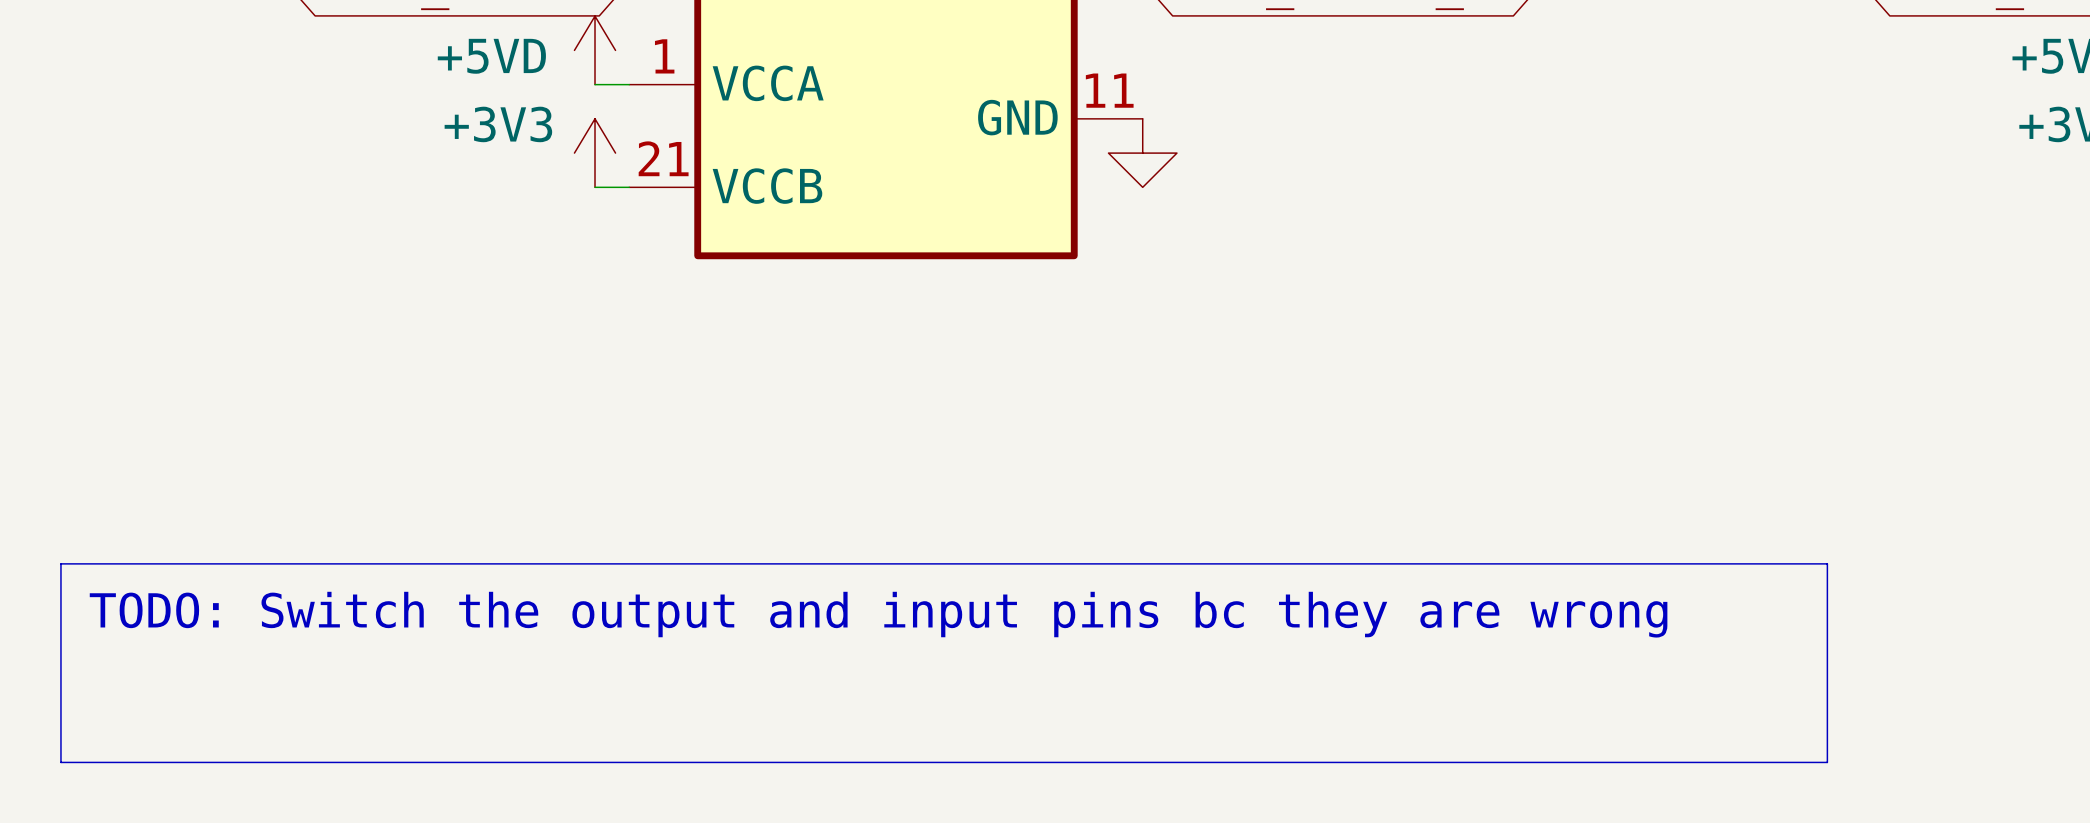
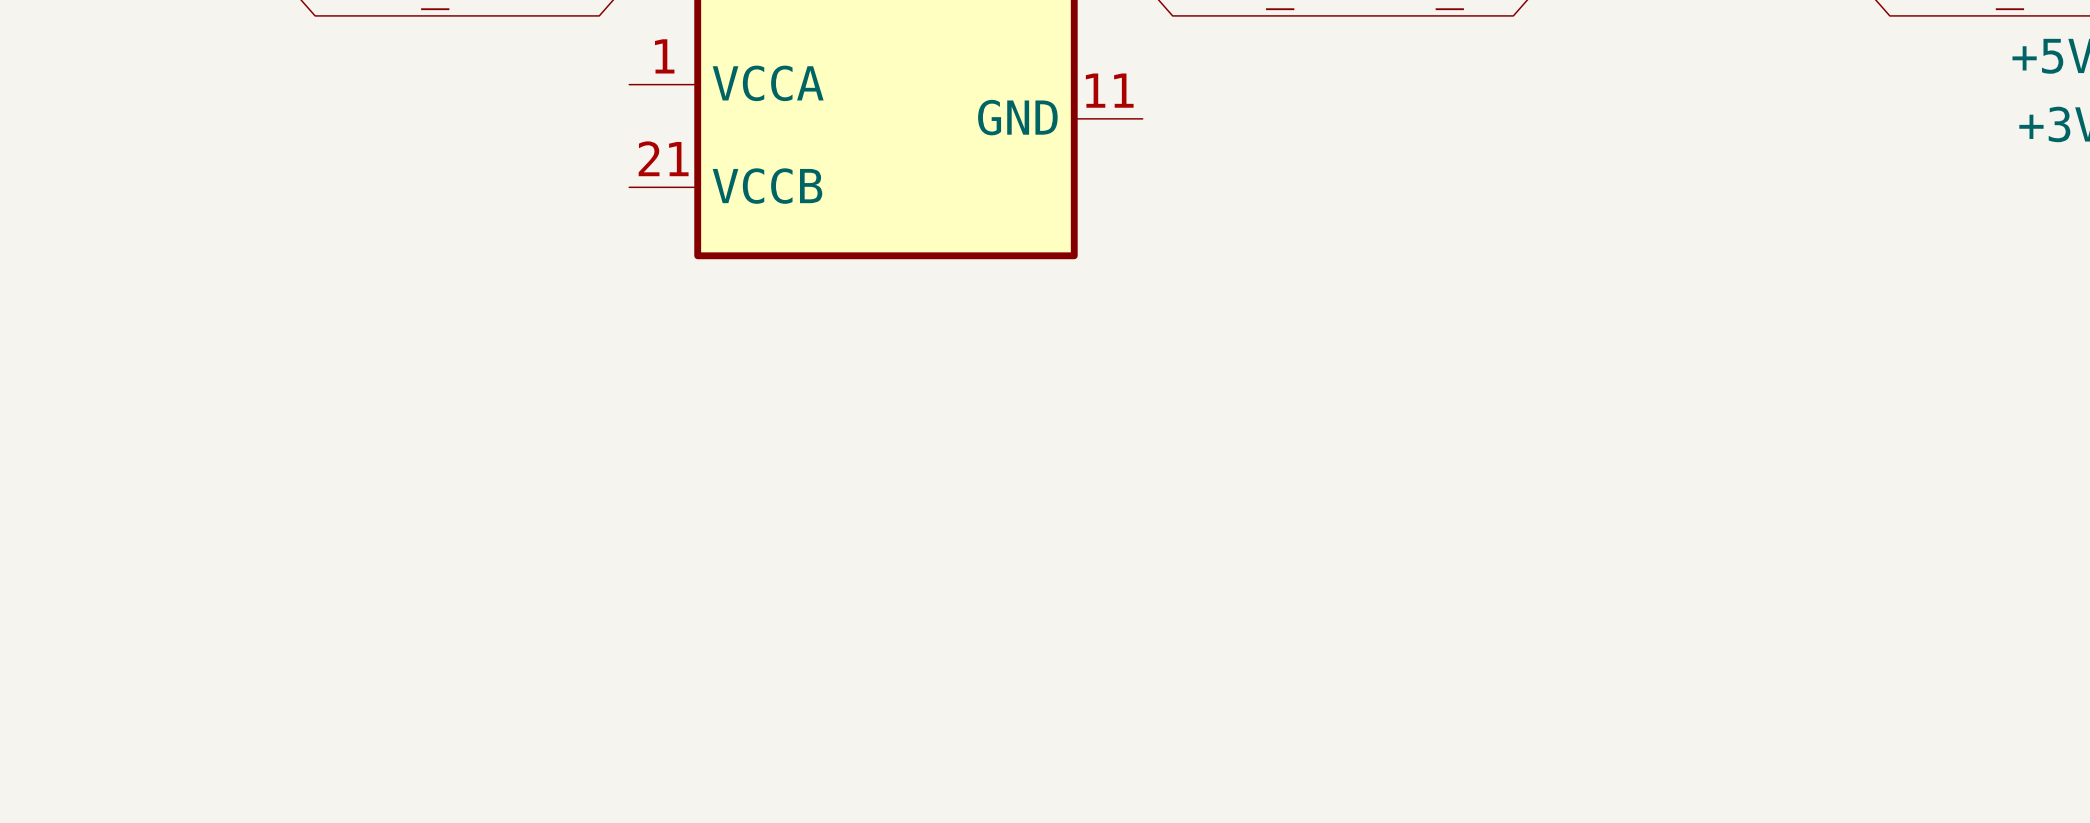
power symbol: +5VD (595, 50) -> none
wire: (595, 84) (629, 84) -> none
power symbol: +3V3 (595, 153) -> none
power symbol: (1142, 153) -> none
wire: (595, 187) (629, 187) -> none
line: (60, 563) (1827, 563) (1827, 762) (60, 762) (60, 563) -> none
text: TODO: Switch the output and input pins bc they are wrong (878, 614) -> none

